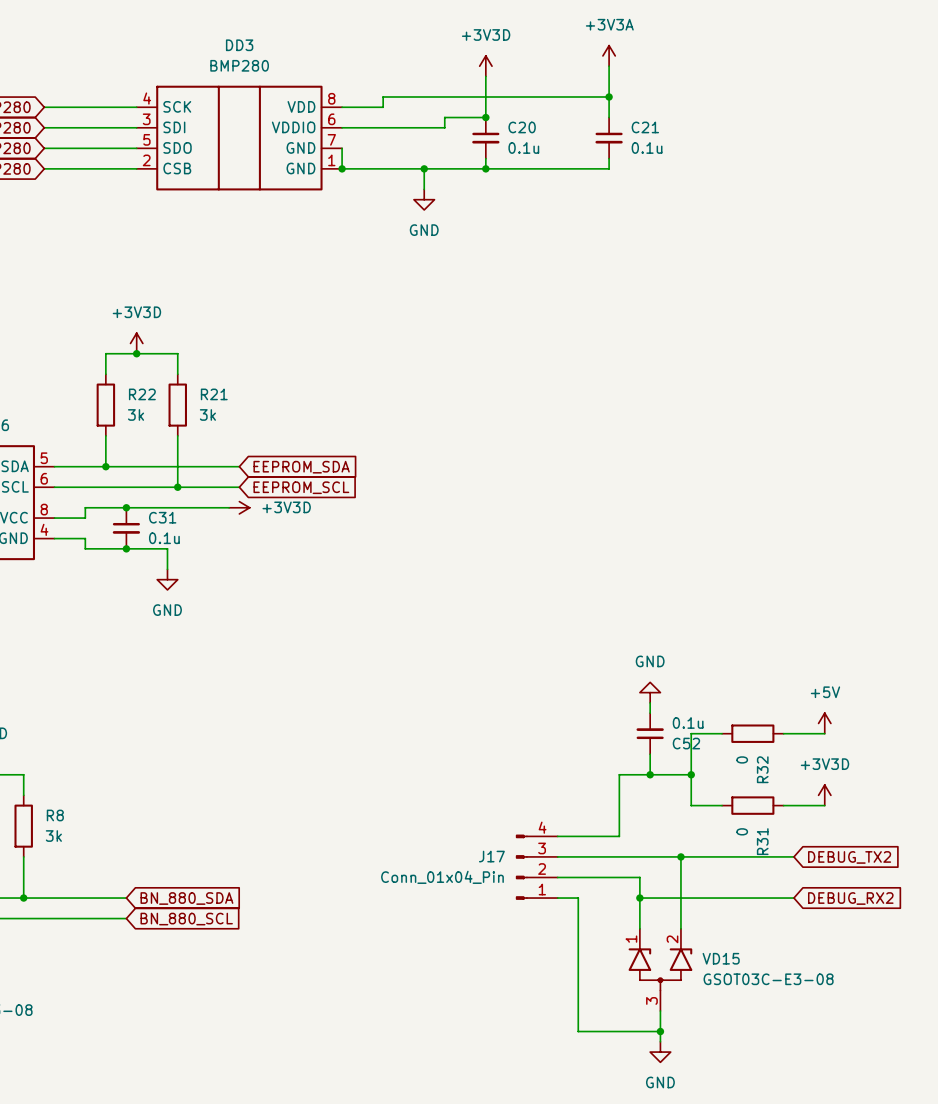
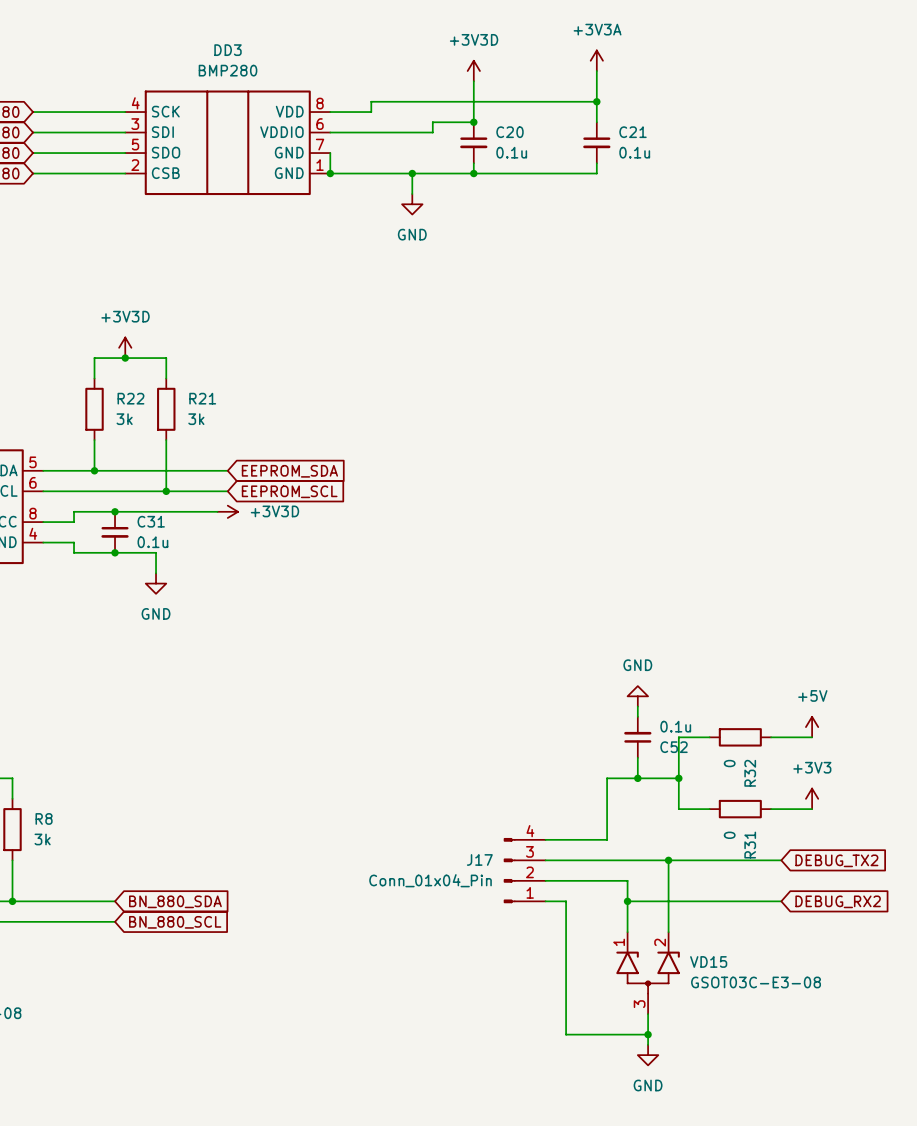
power symbol: +3V3D (824, 795) -> +3V3 (812, 798)

